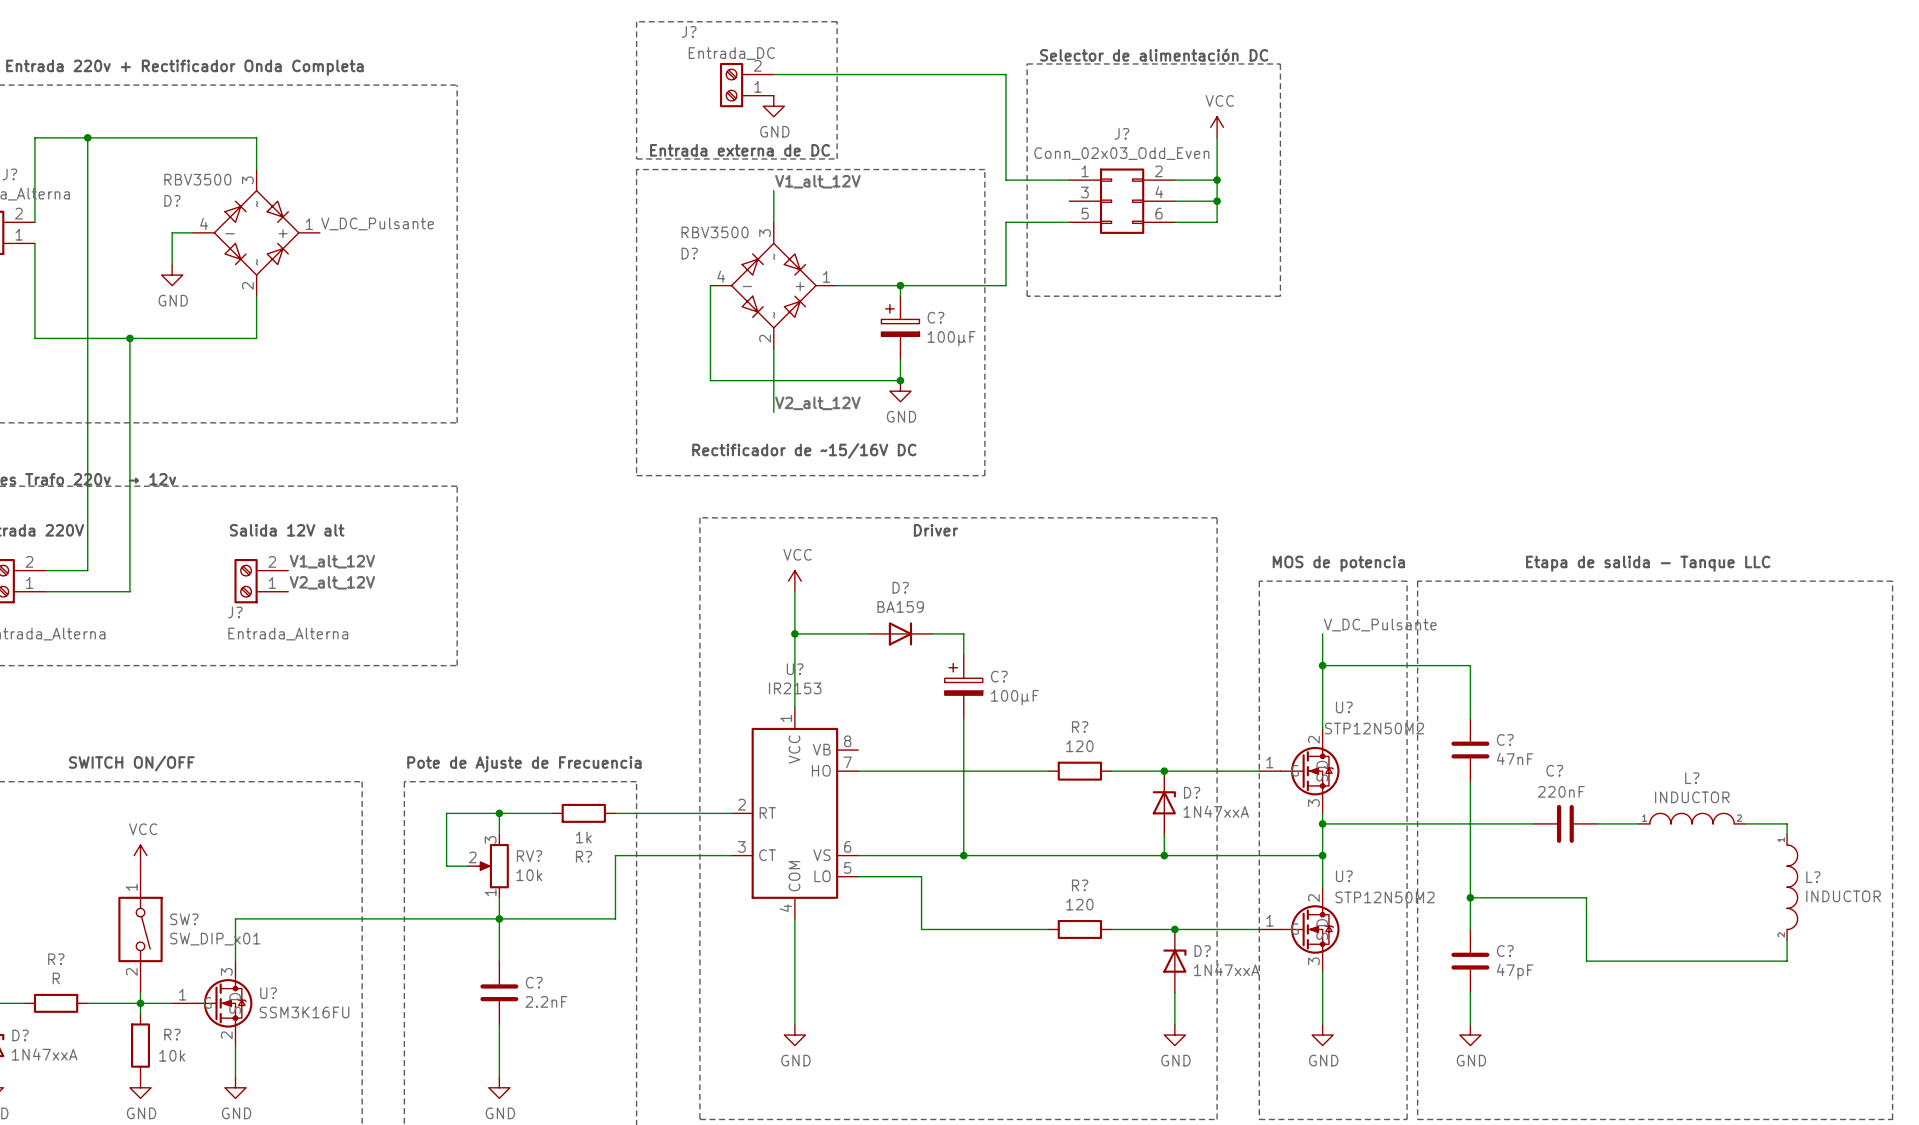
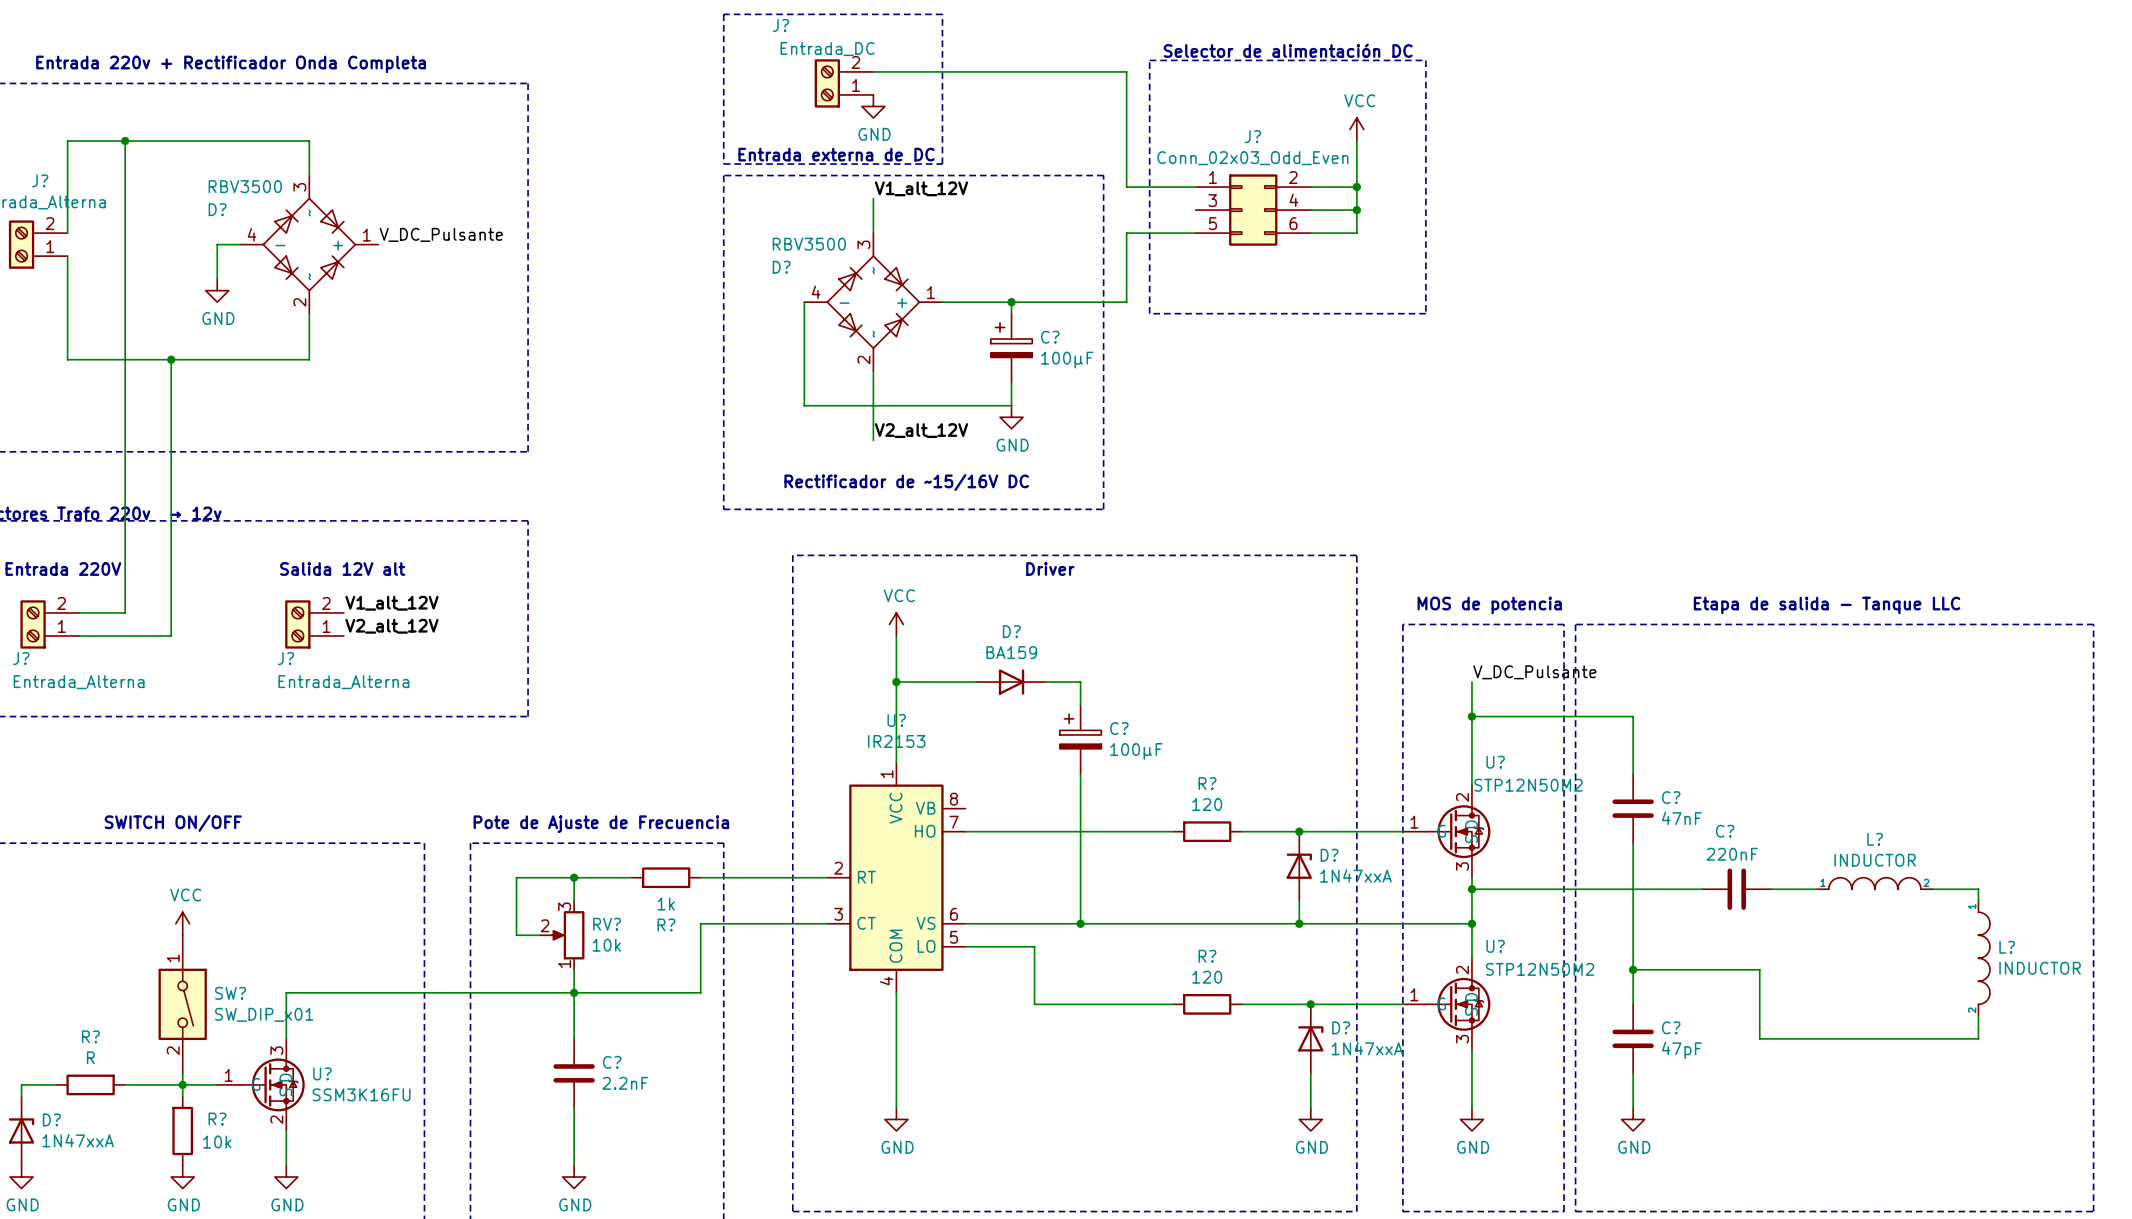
junction: (900, 380) -> none

